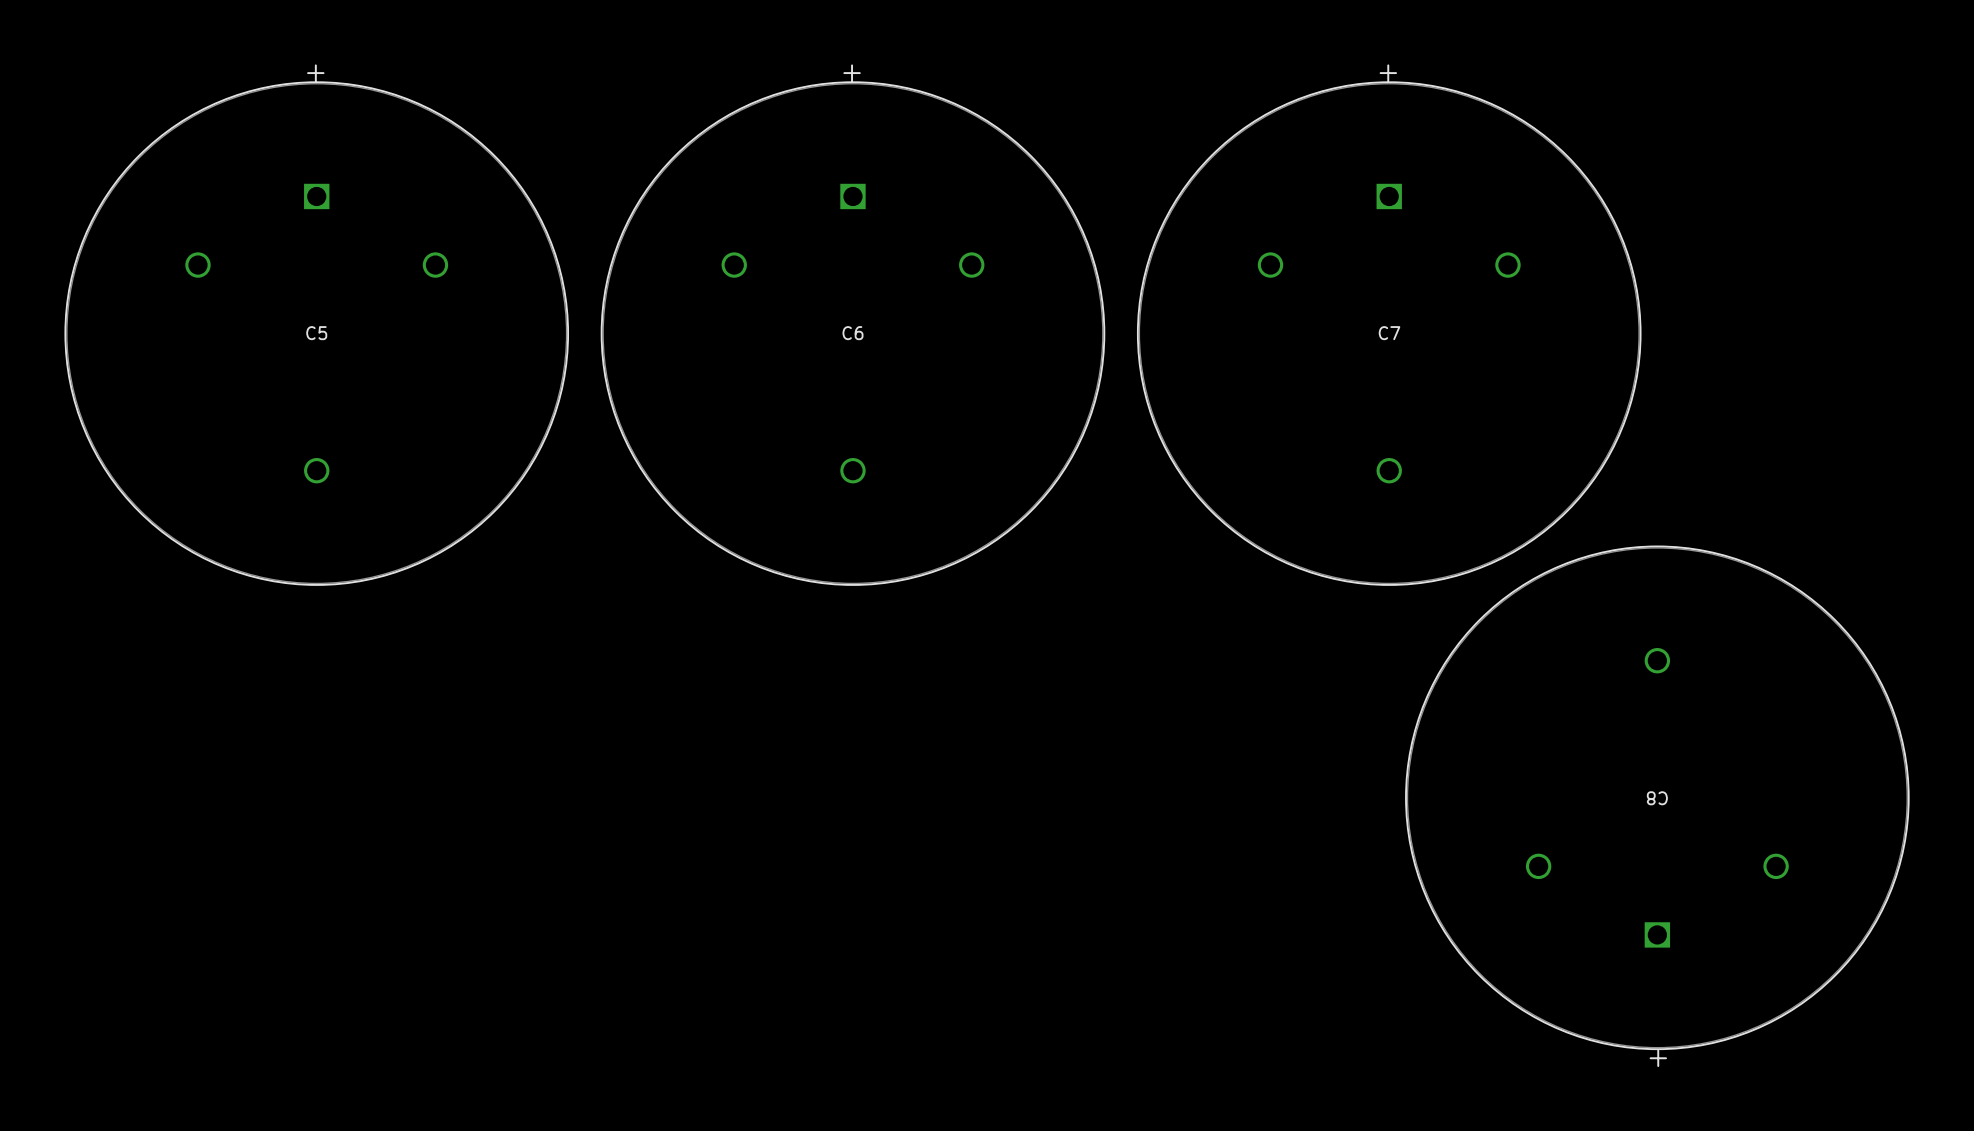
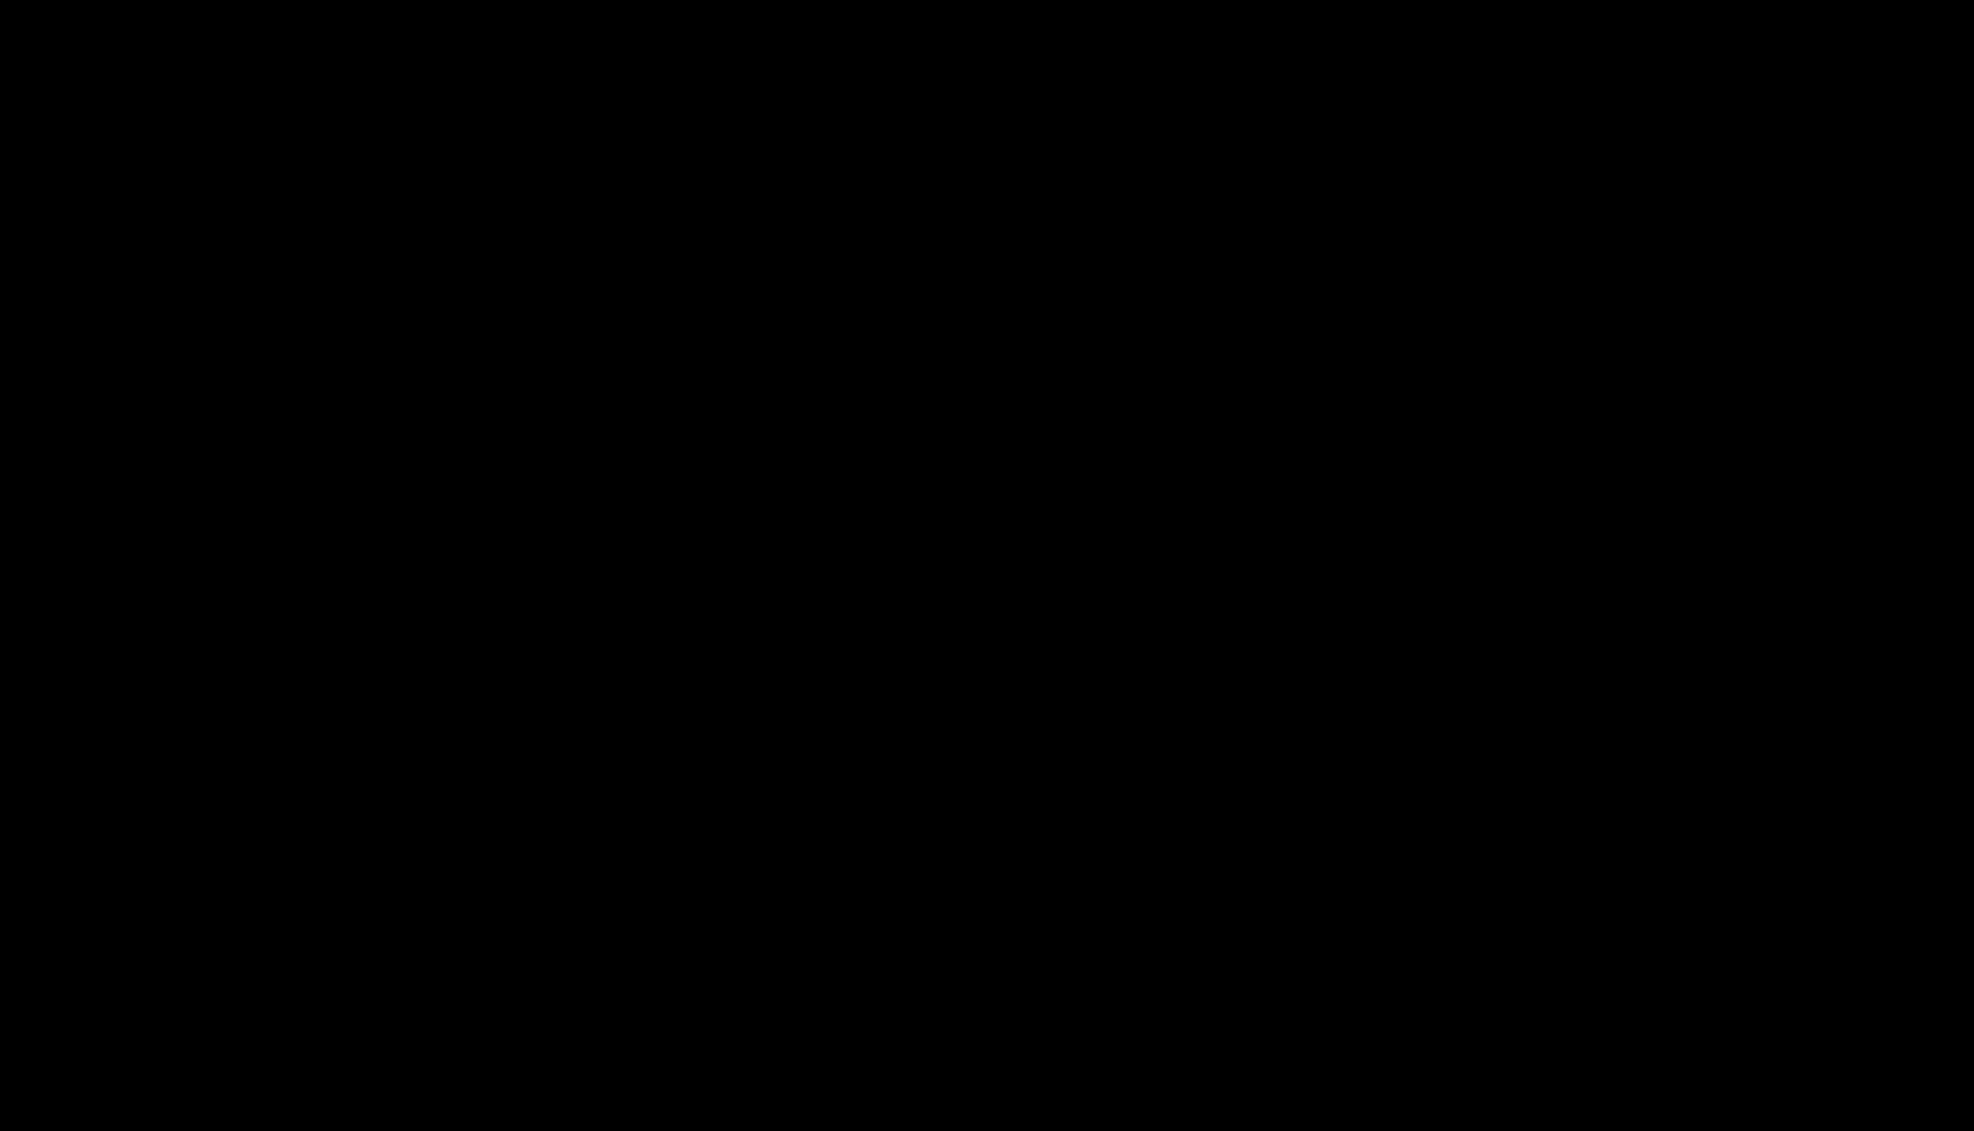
C5: (316, 325) -> none
C6: (852, 325) -> none
C7: (1389, 325) -> none
C8: (1657, 806) -> none

